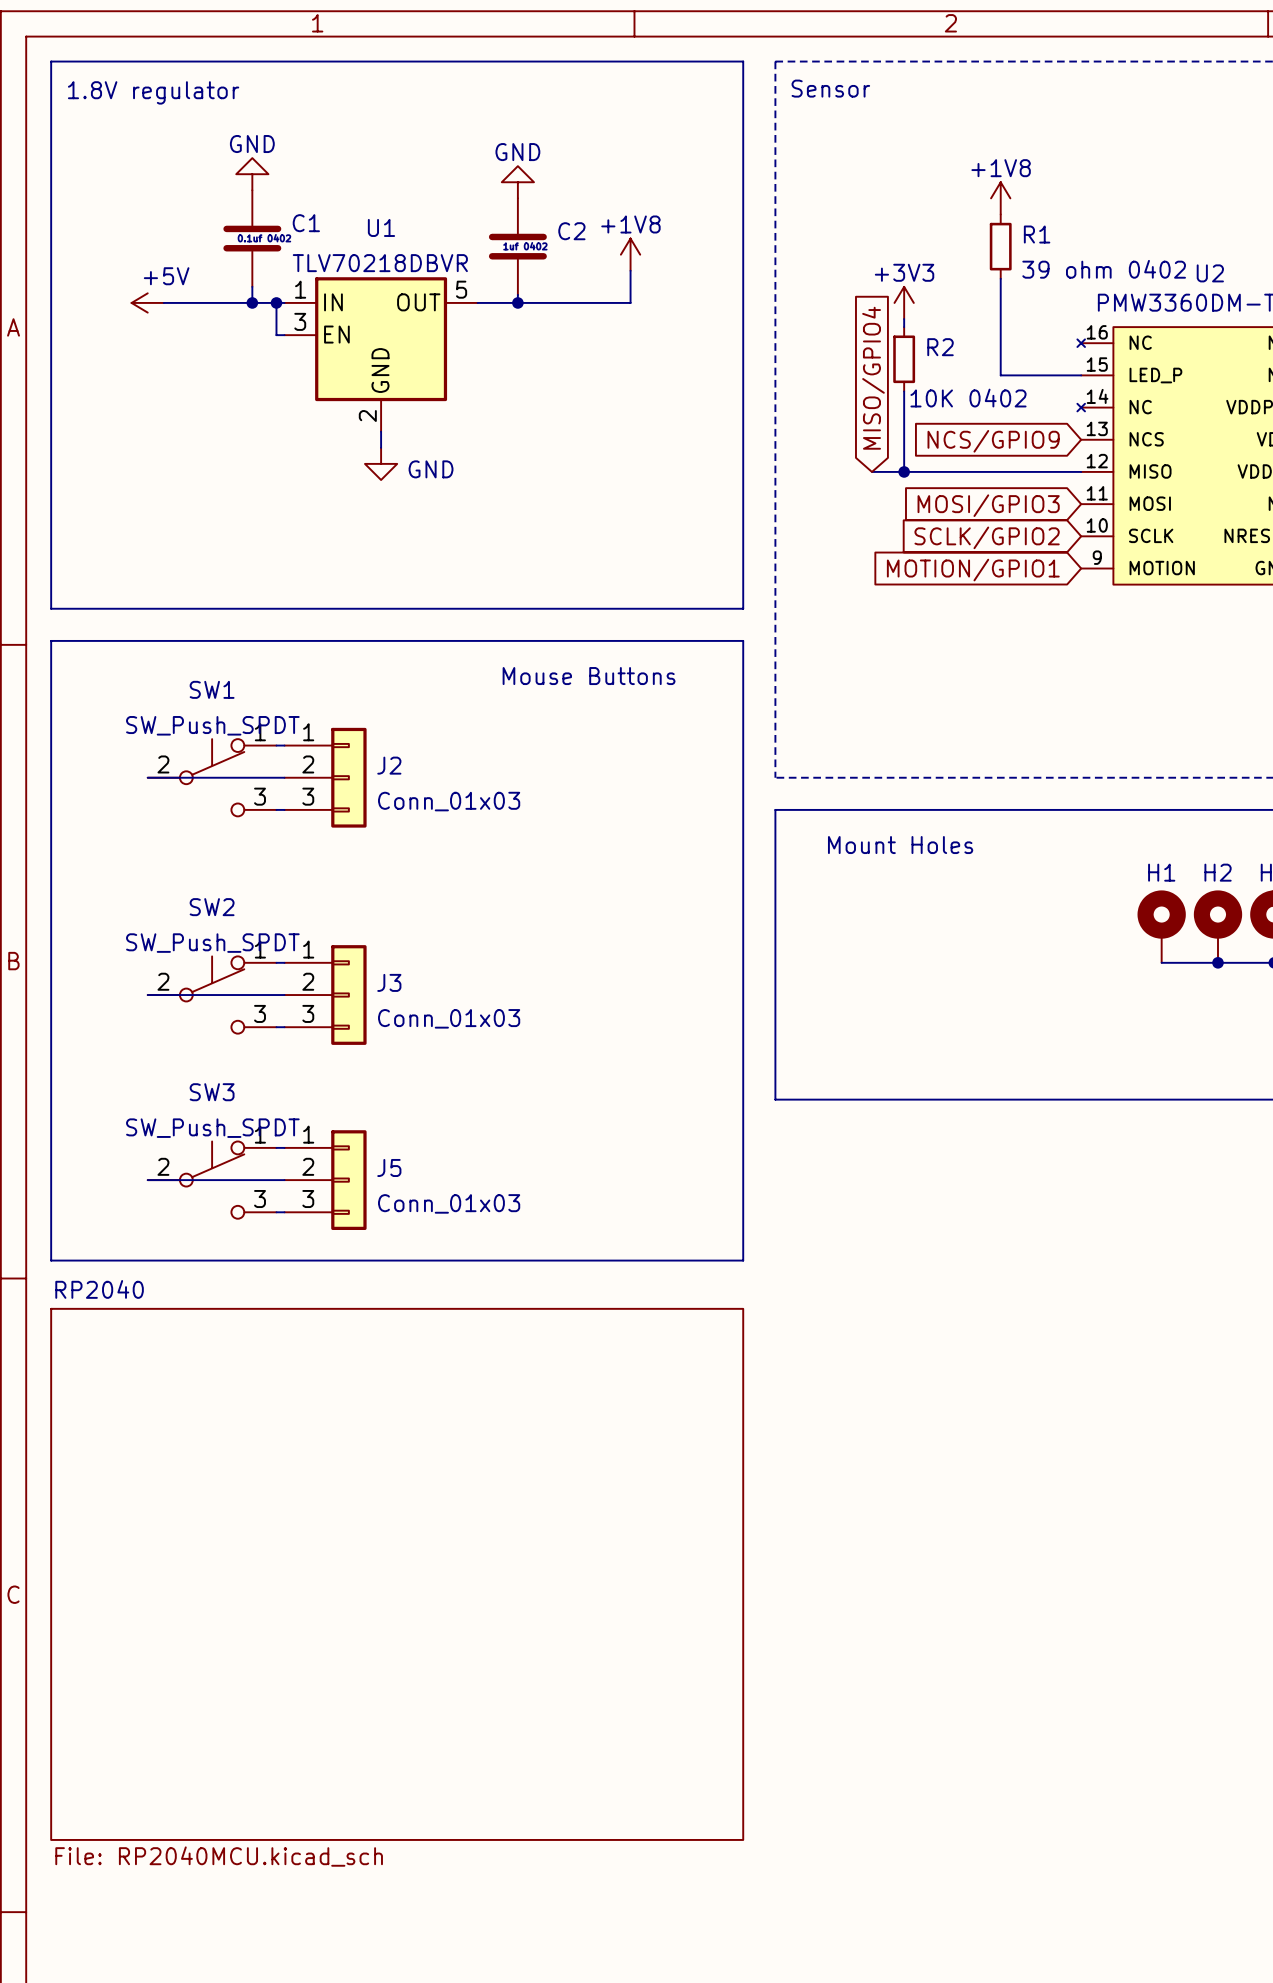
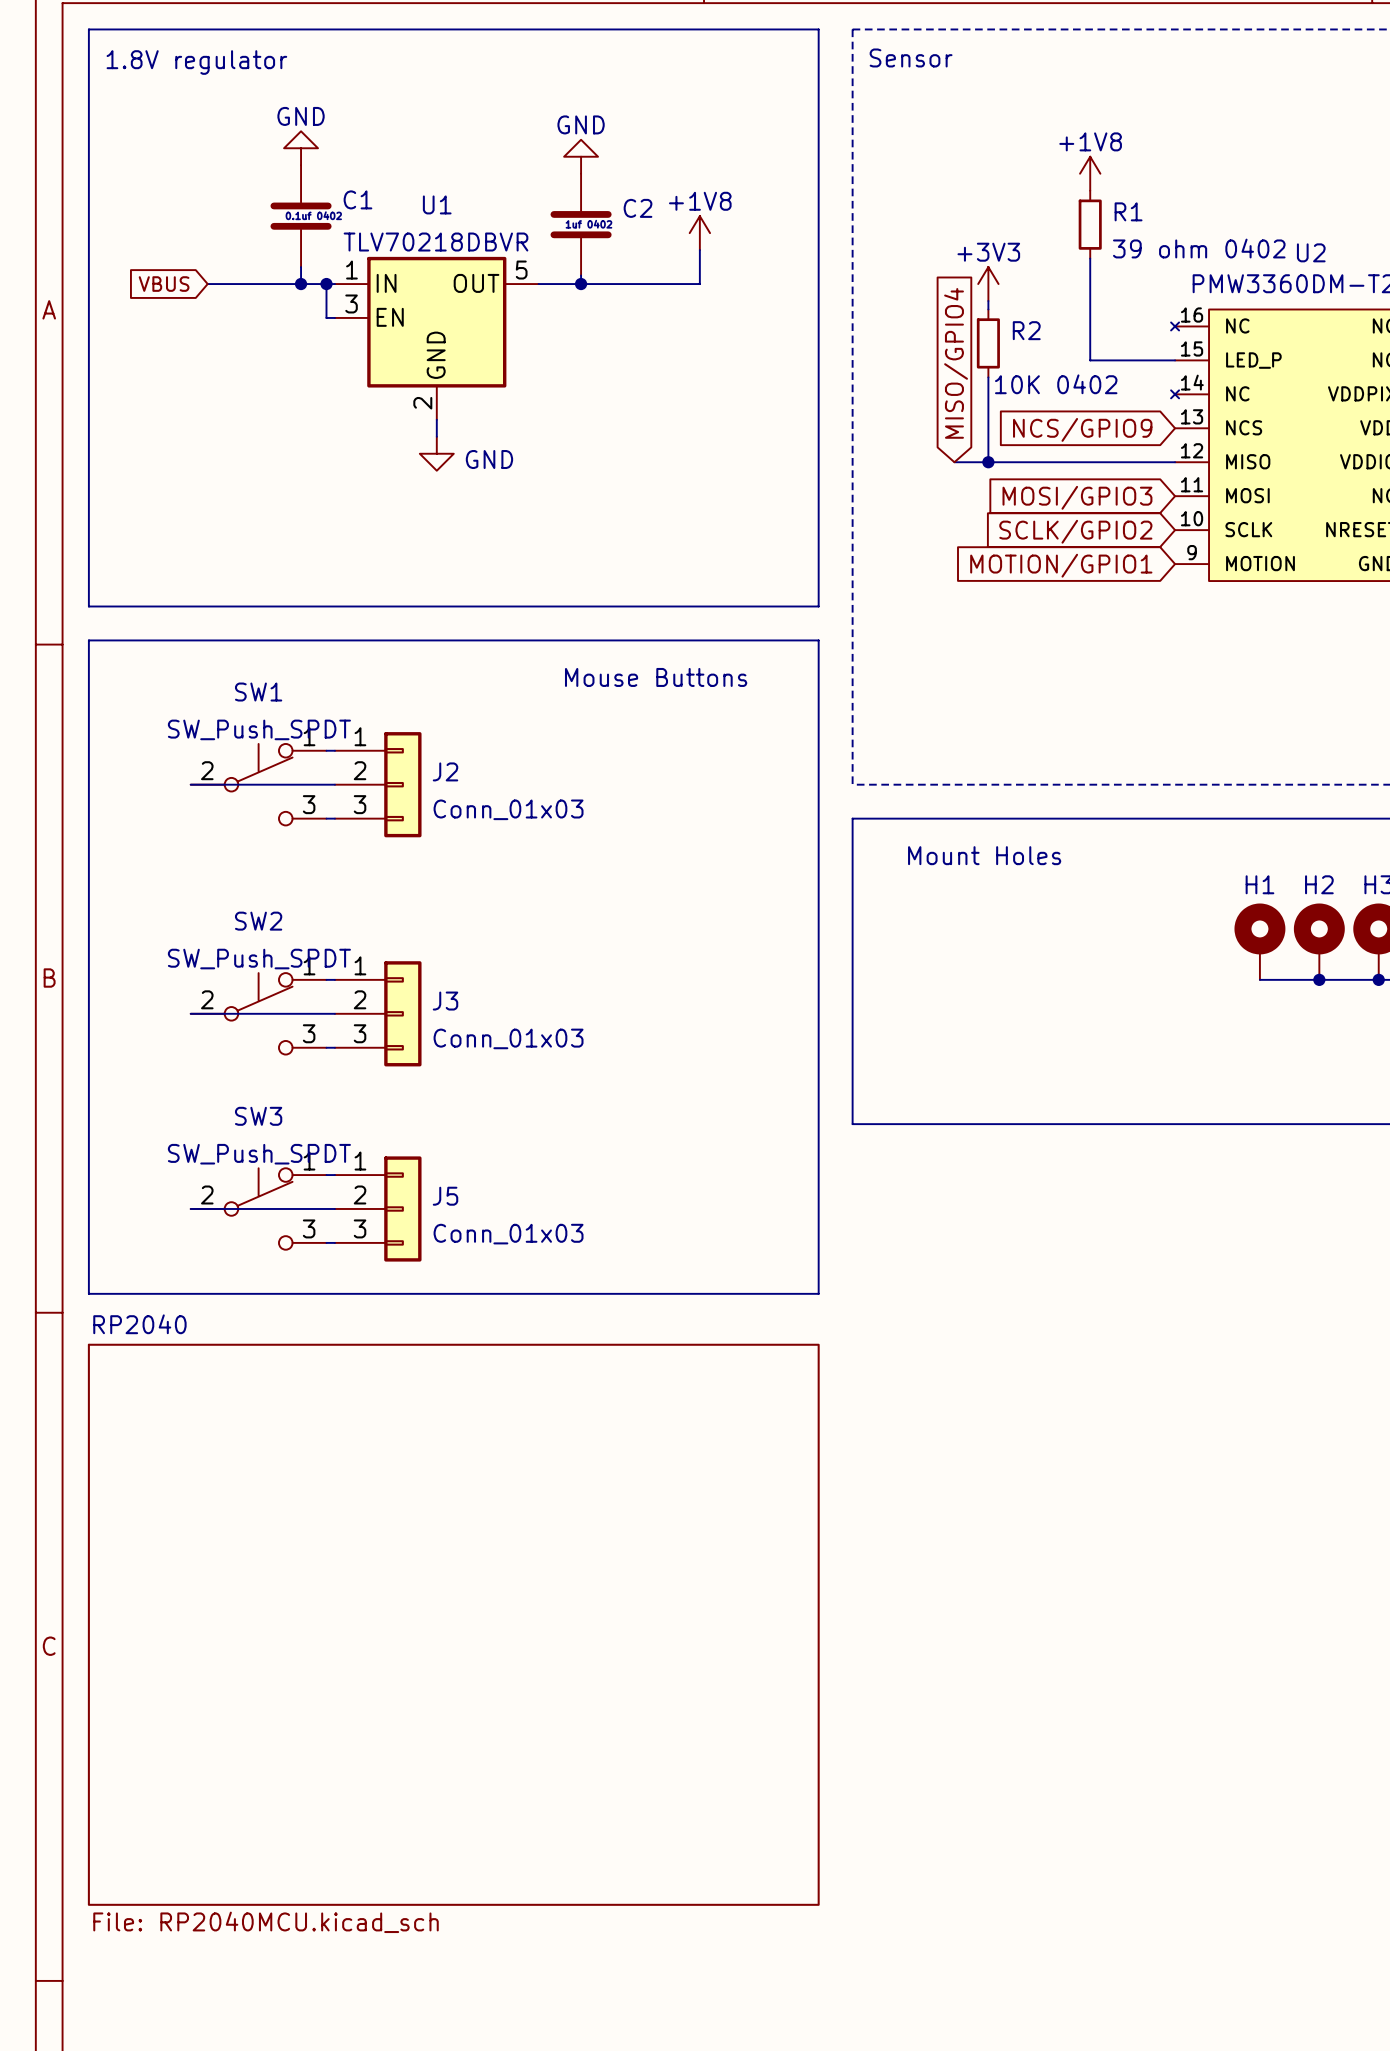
global label: none -> VBUS (164, 284)
power symbol: +5V (147, 302) -> none

